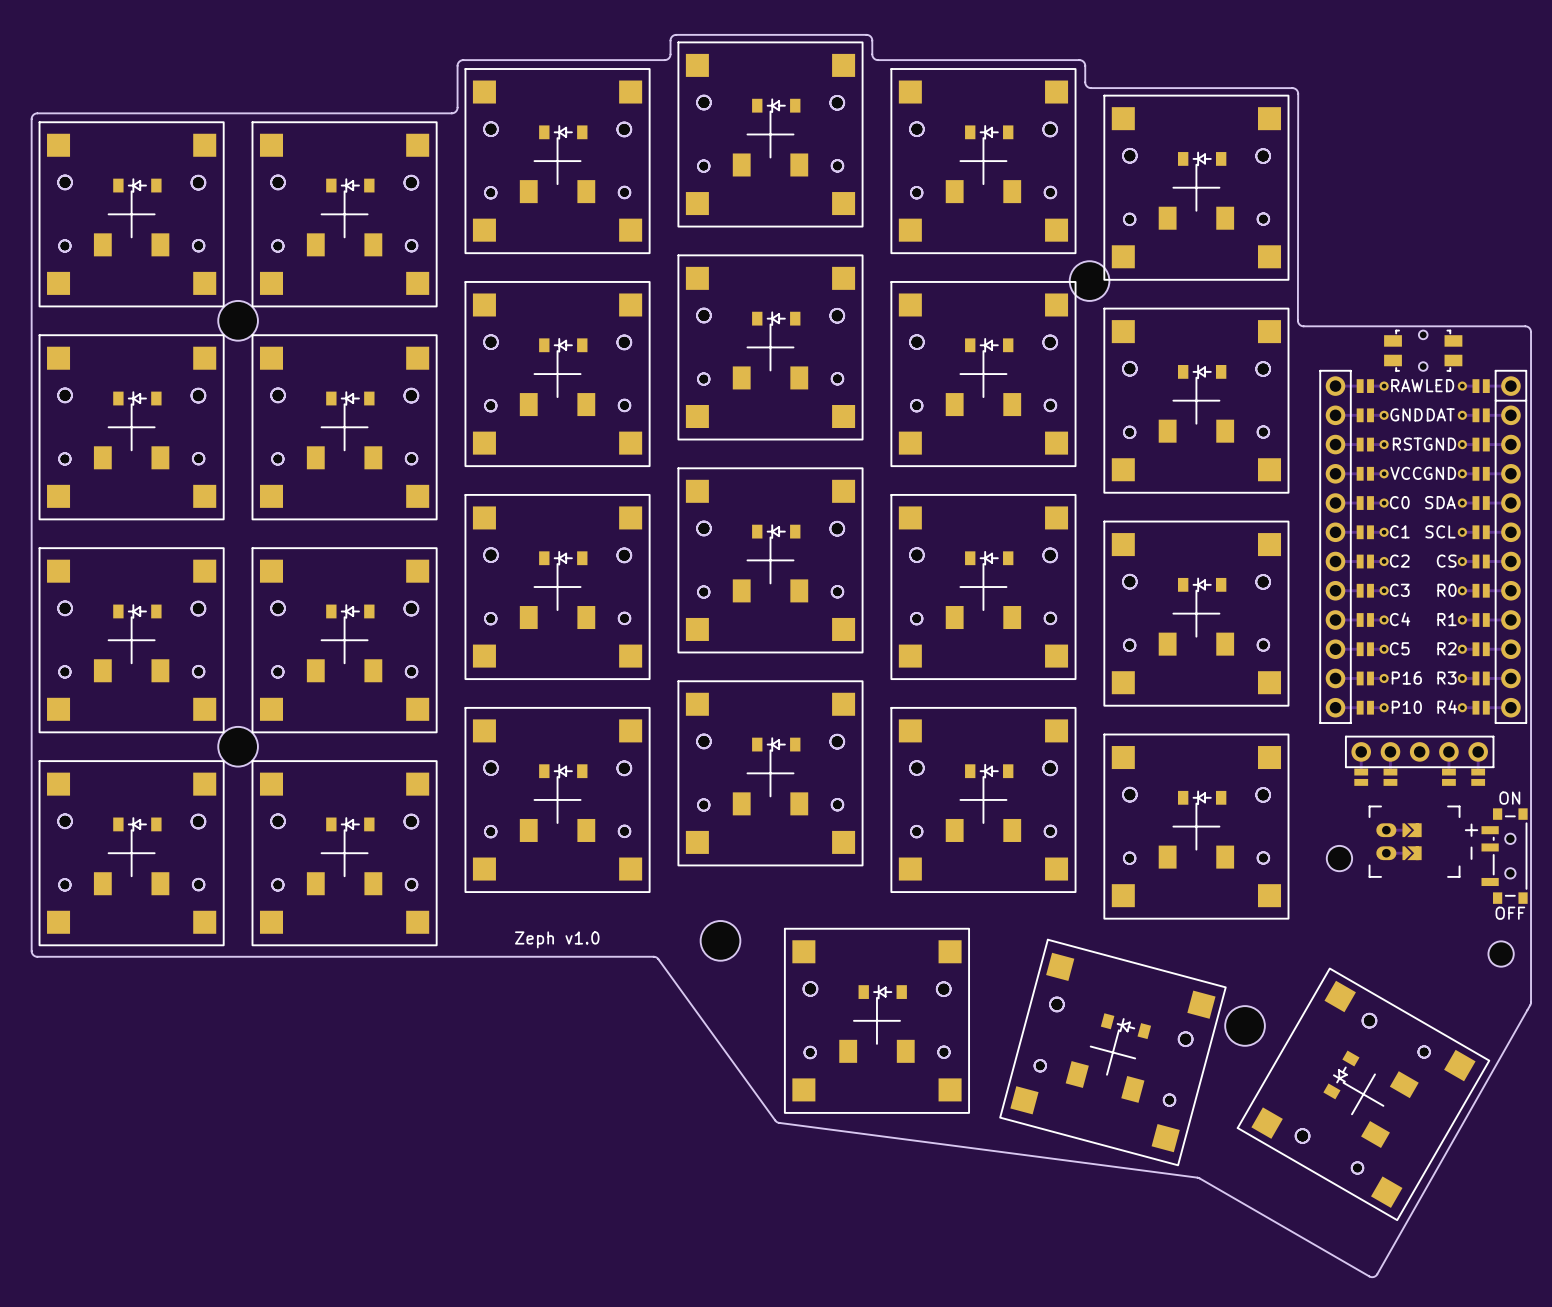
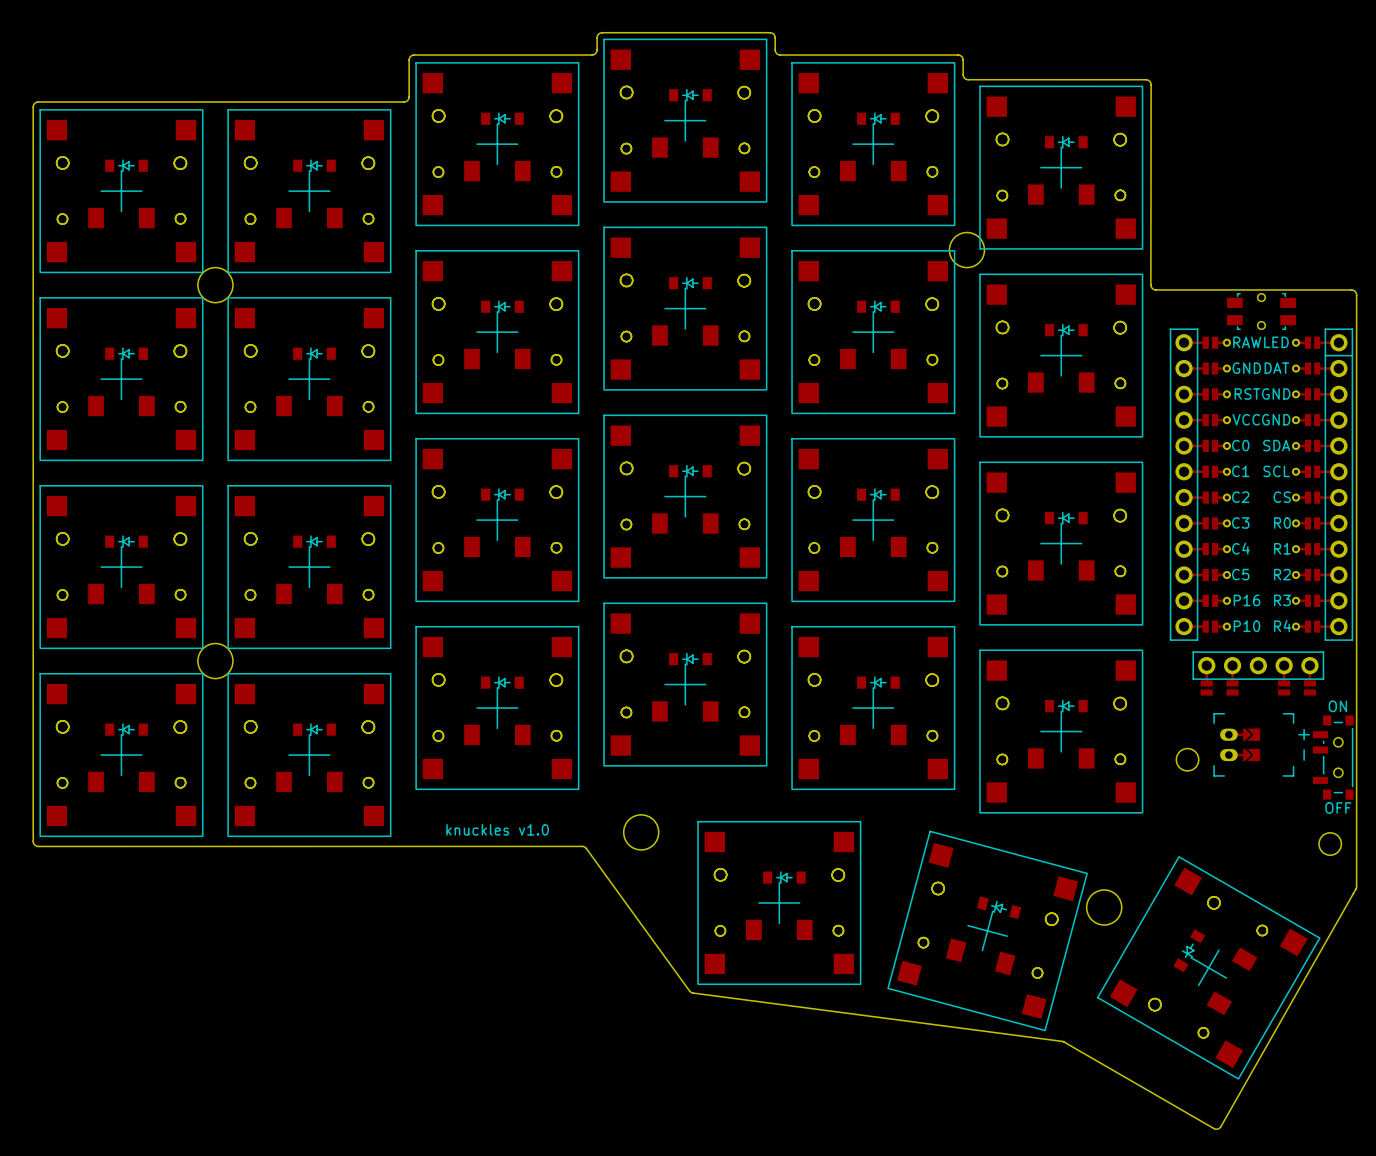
text: Zeph v1.0 (557, 939) -> knuckles v1.0 (497, 829)

